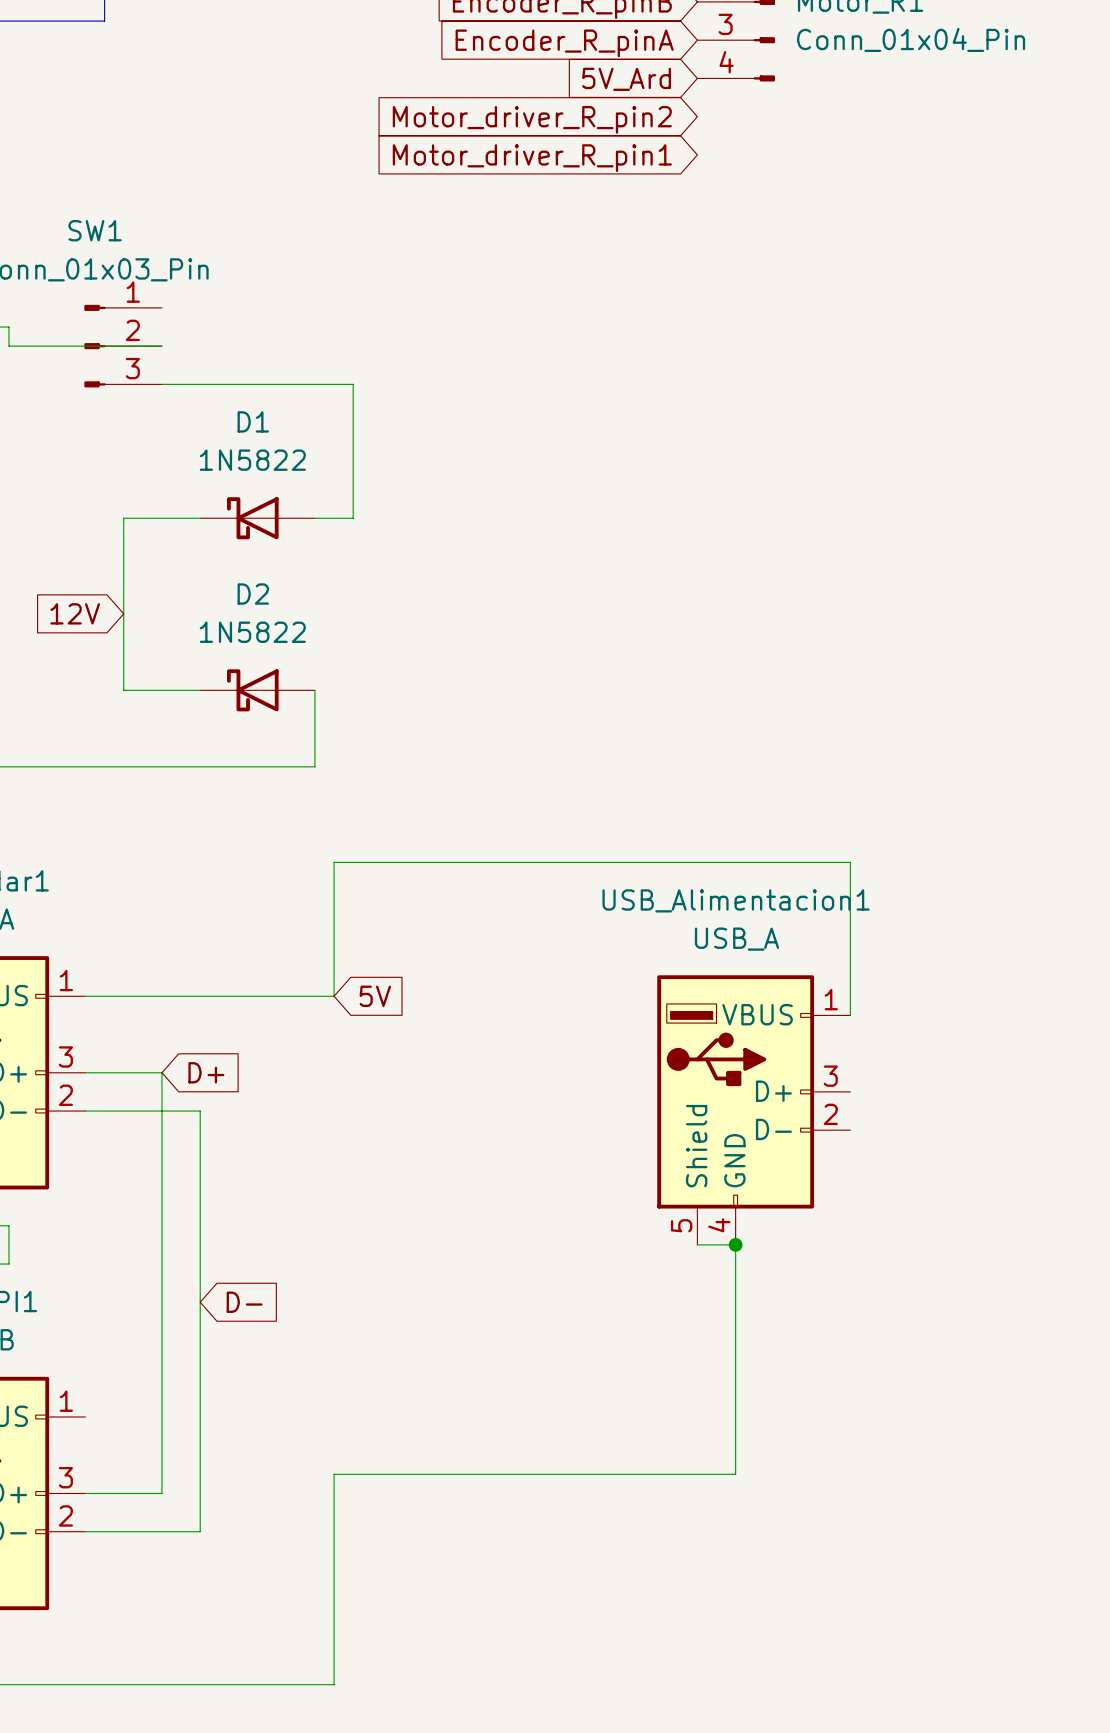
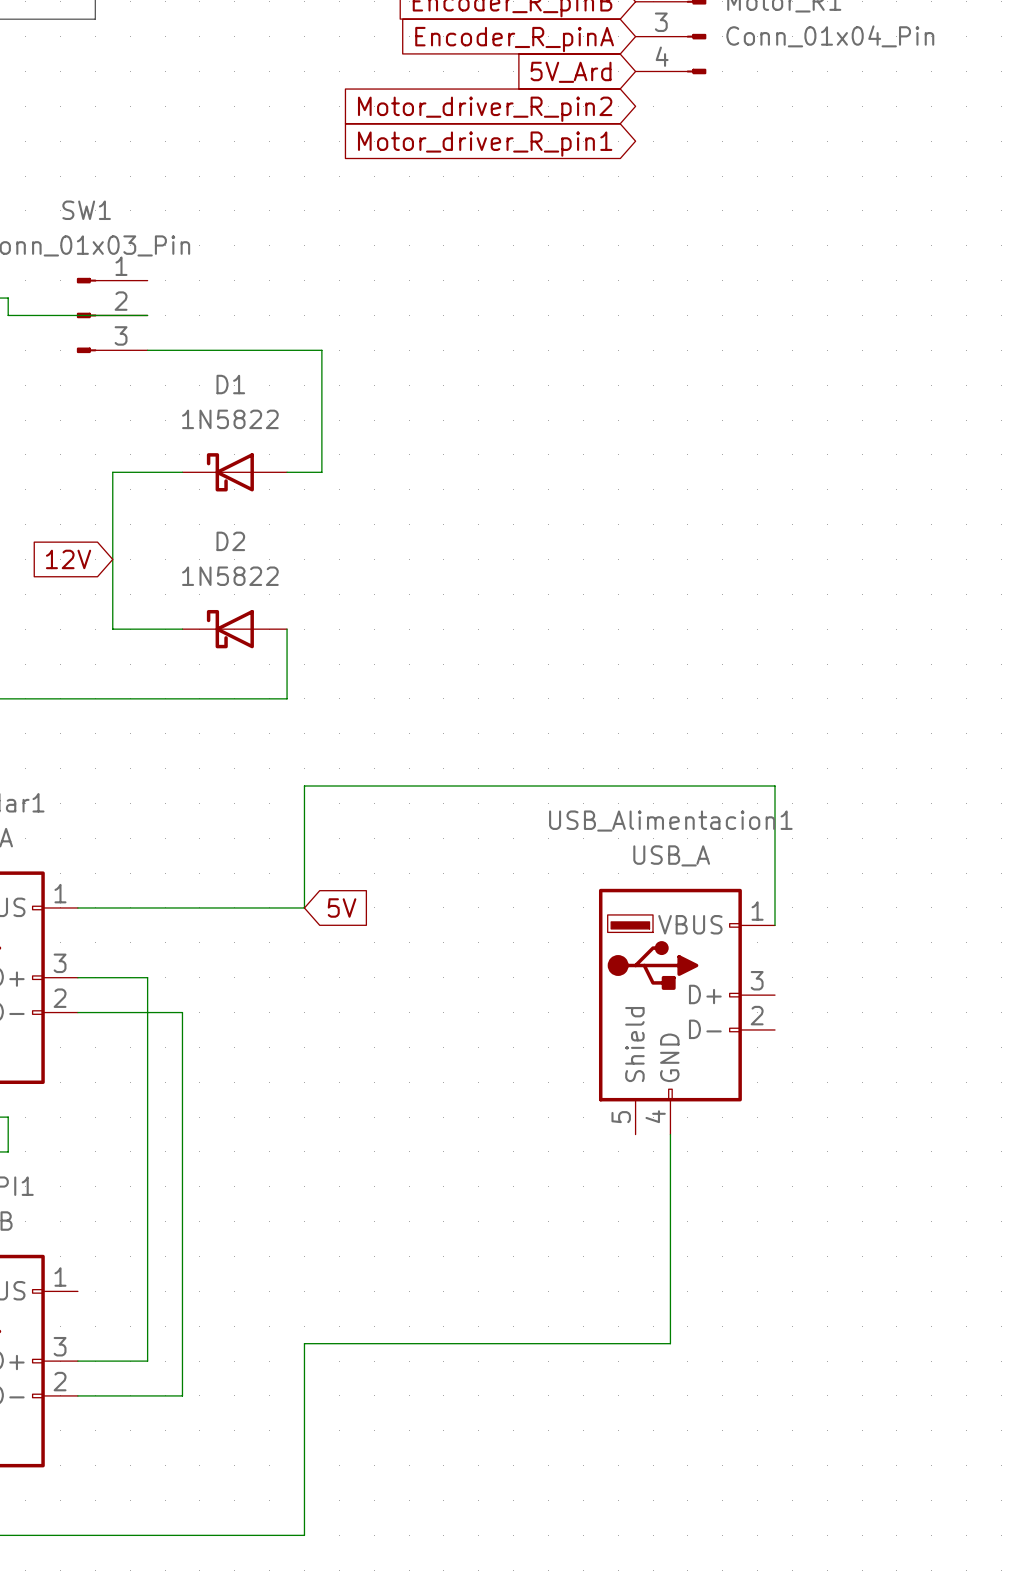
global label: D+ (206, 1072) -> none
wire: (697, 1244) (735, 1244) -> none
junction: (735, 1244) -> none
global label: D- (244, 1302) -> none

